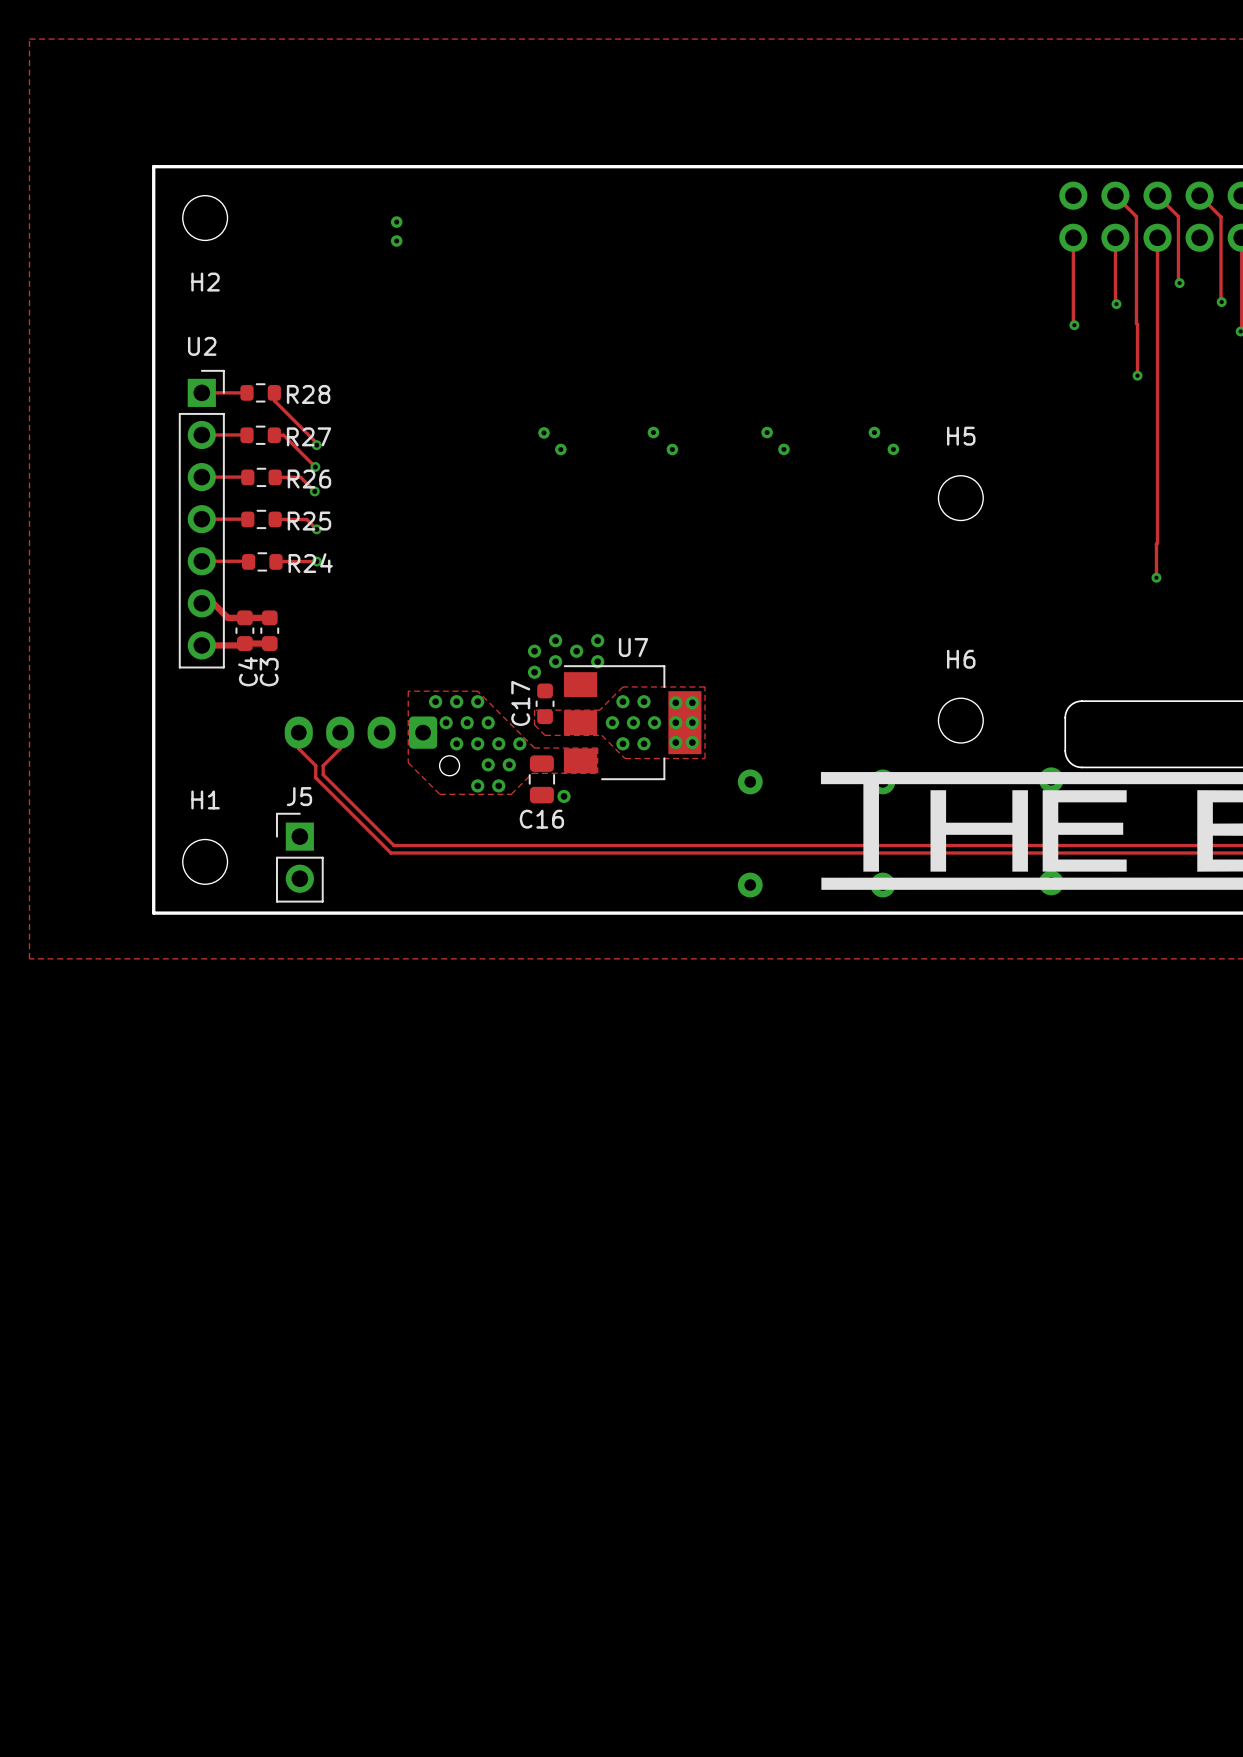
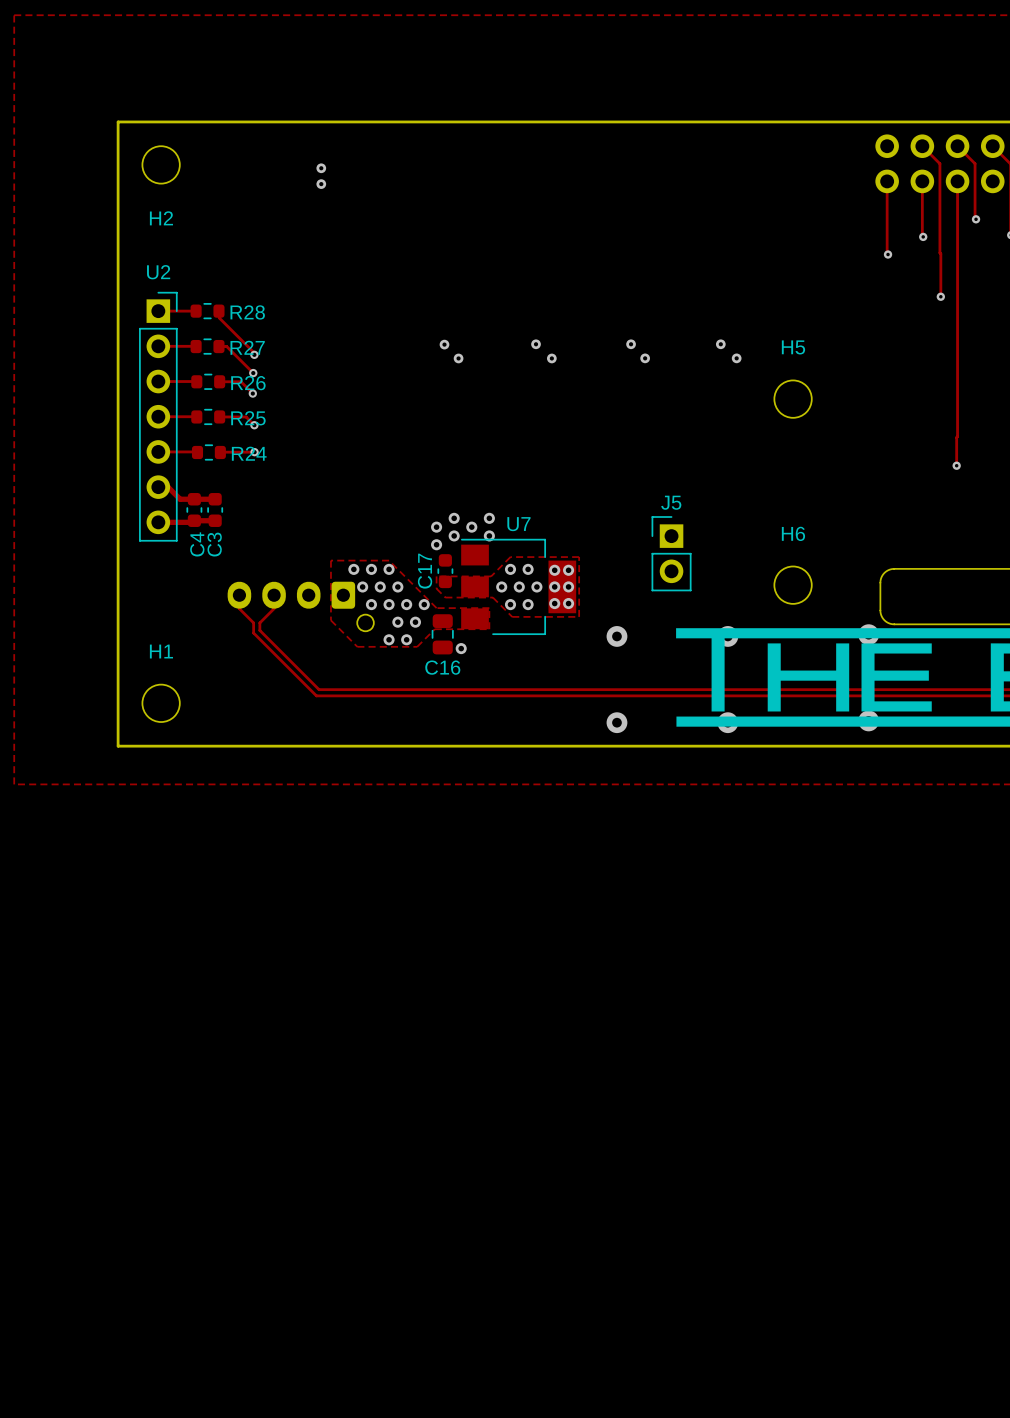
J5 position: (299, 857) -> (671, 553)

